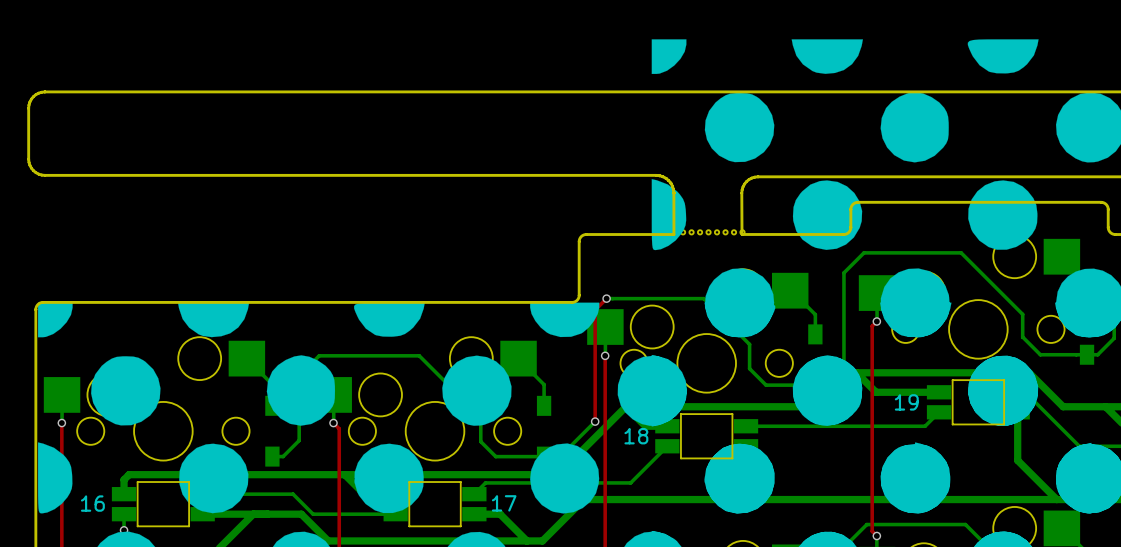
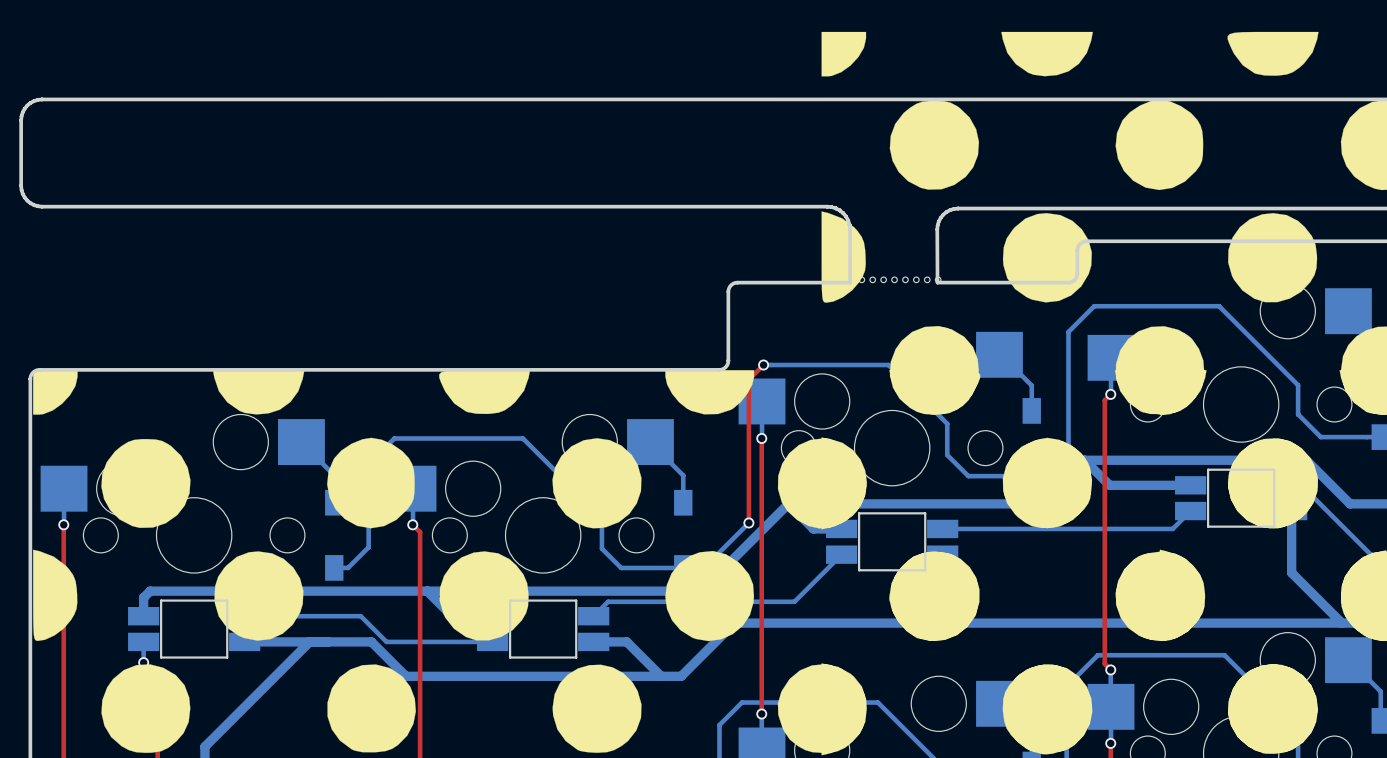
text: 19 (906, 402) -> none
text: 18 (636, 436) -> none
text: 16 (92, 503) -> none
text: 17 (504, 503) -> none

